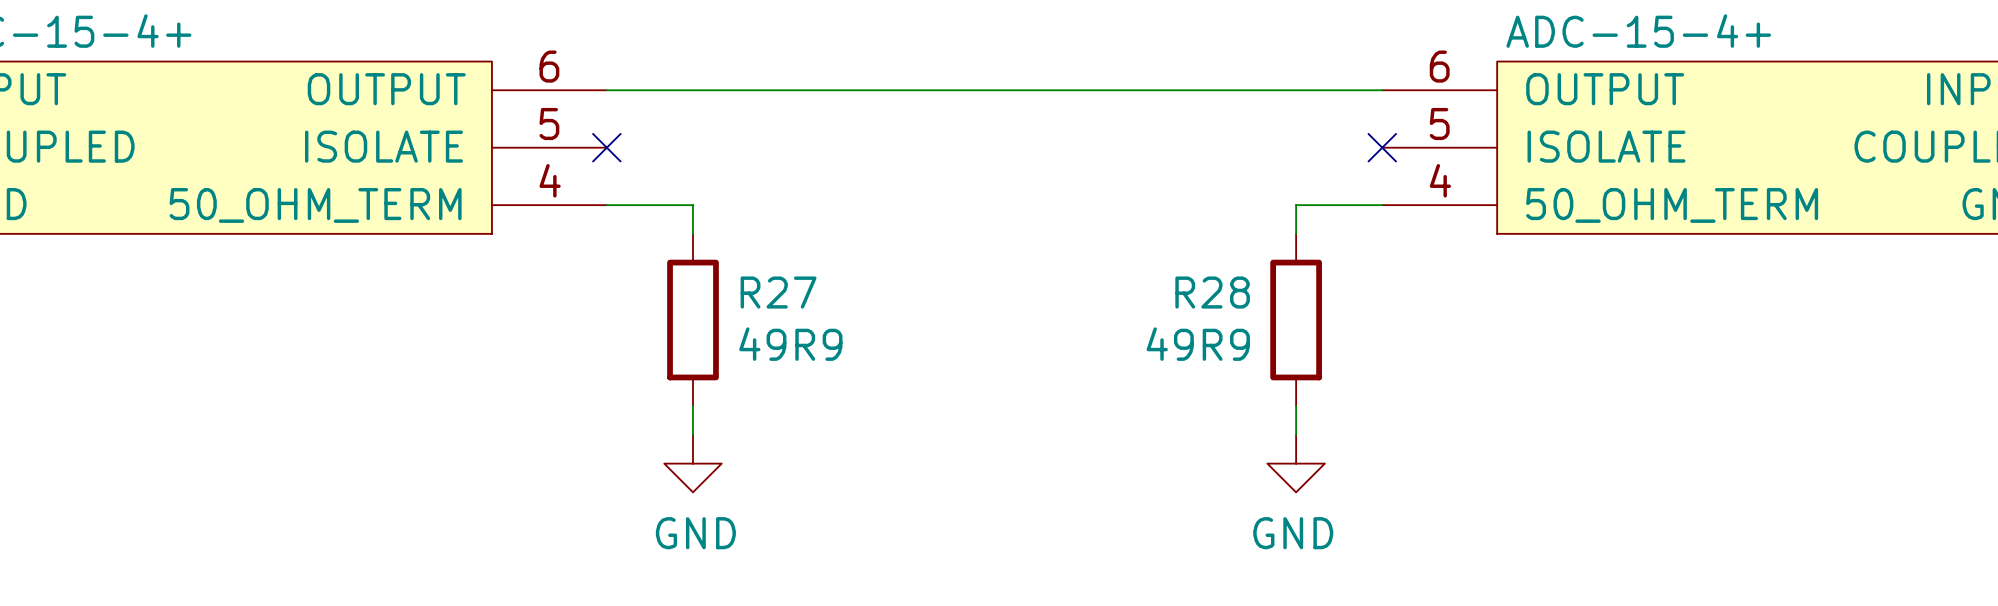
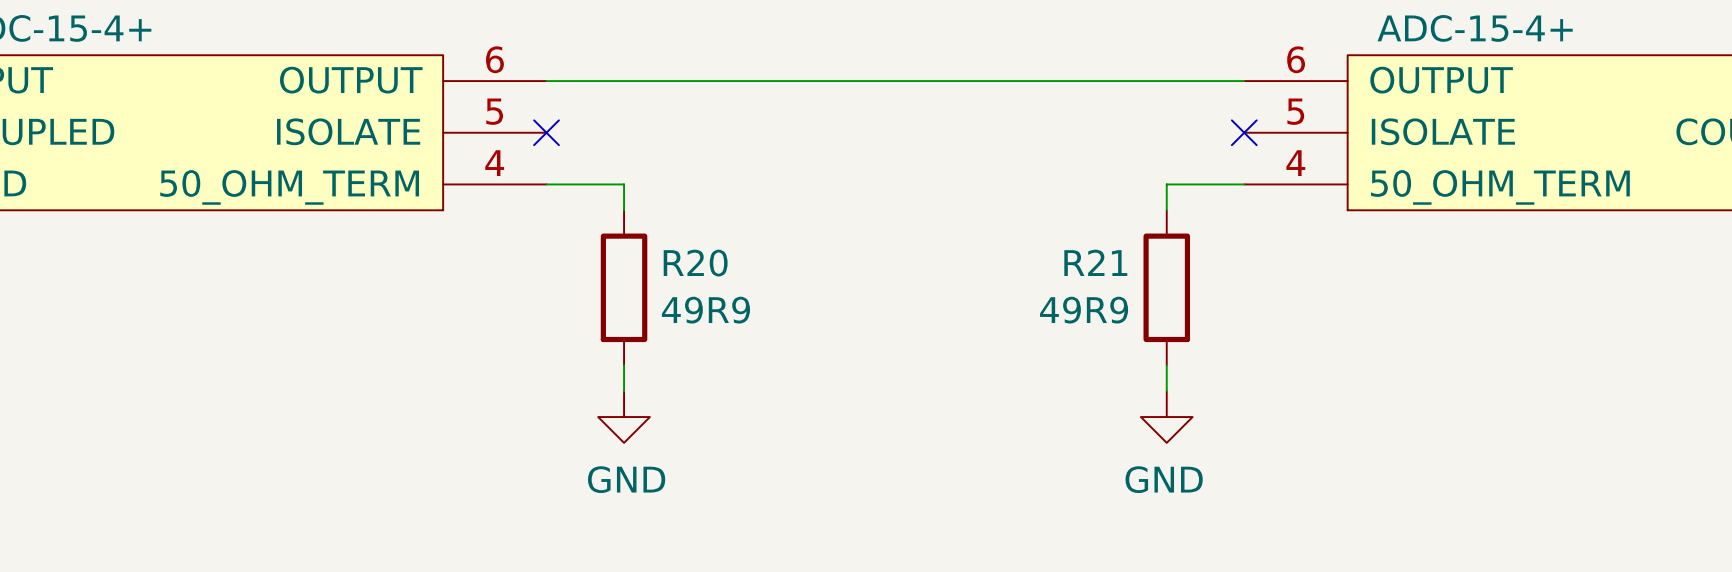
R27 name: R27 (778, 292) -> R20 (695, 263)
R28 name: R28 (1212, 292) -> R21 (1095, 262)

